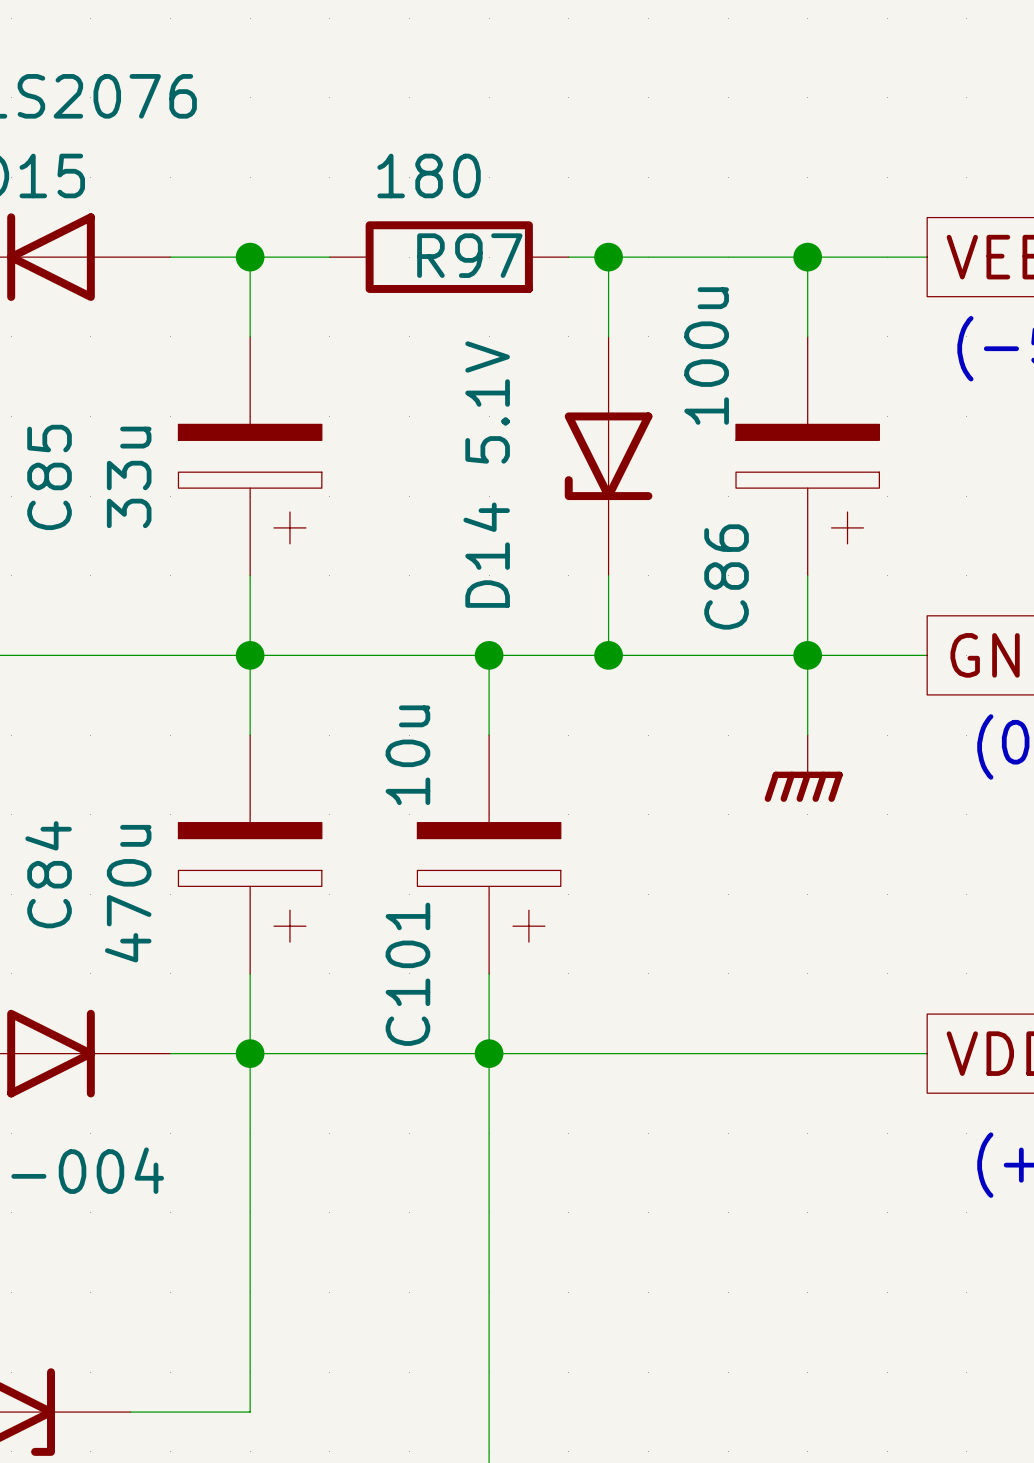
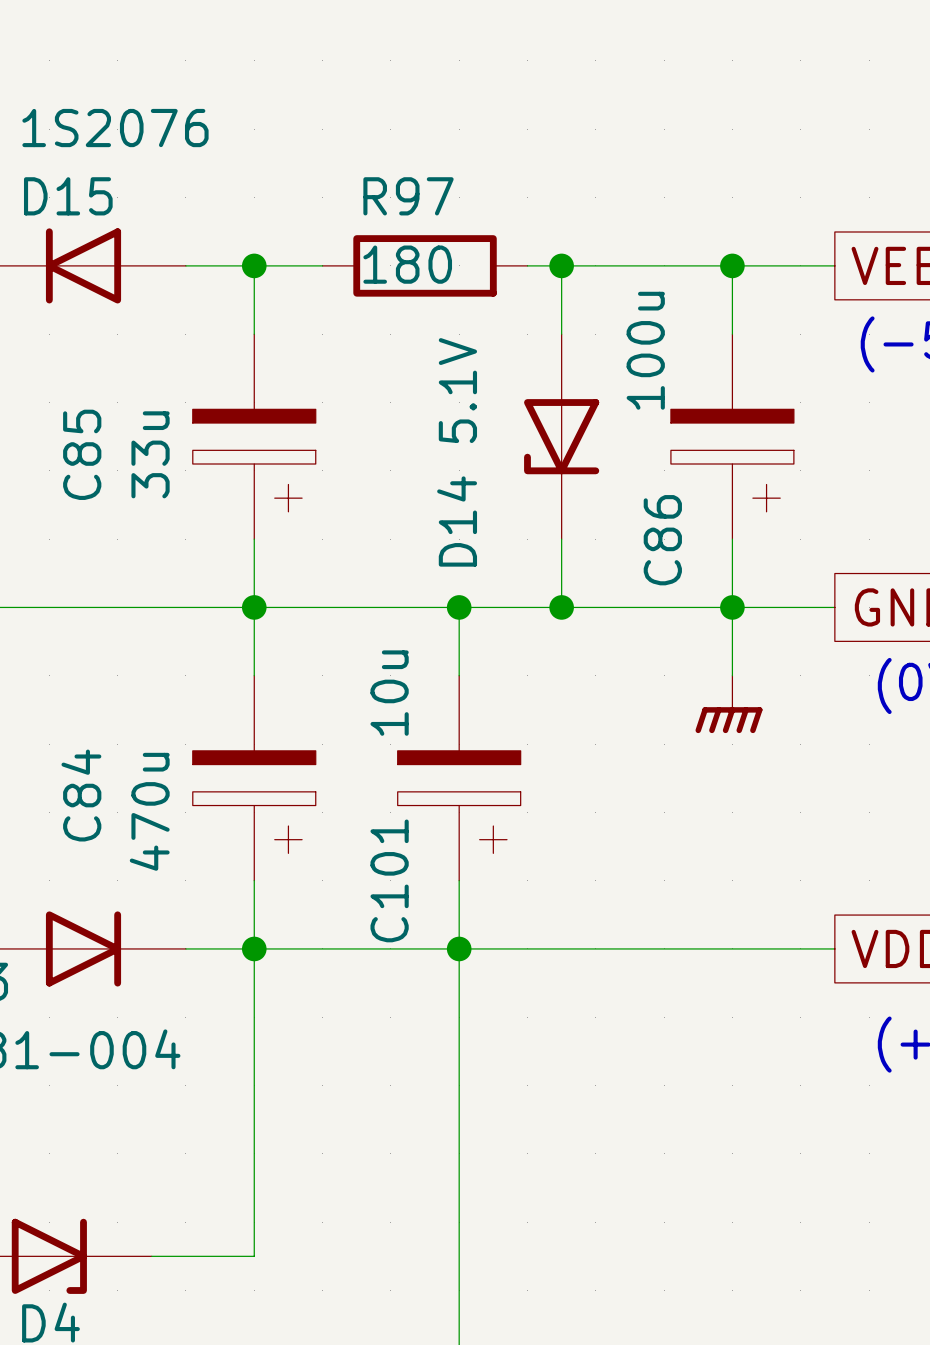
R97 value position: 180 (429, 175) -> 180 (407, 264)
R97 name position: R97 (469, 255) -> R97 (408, 196)

